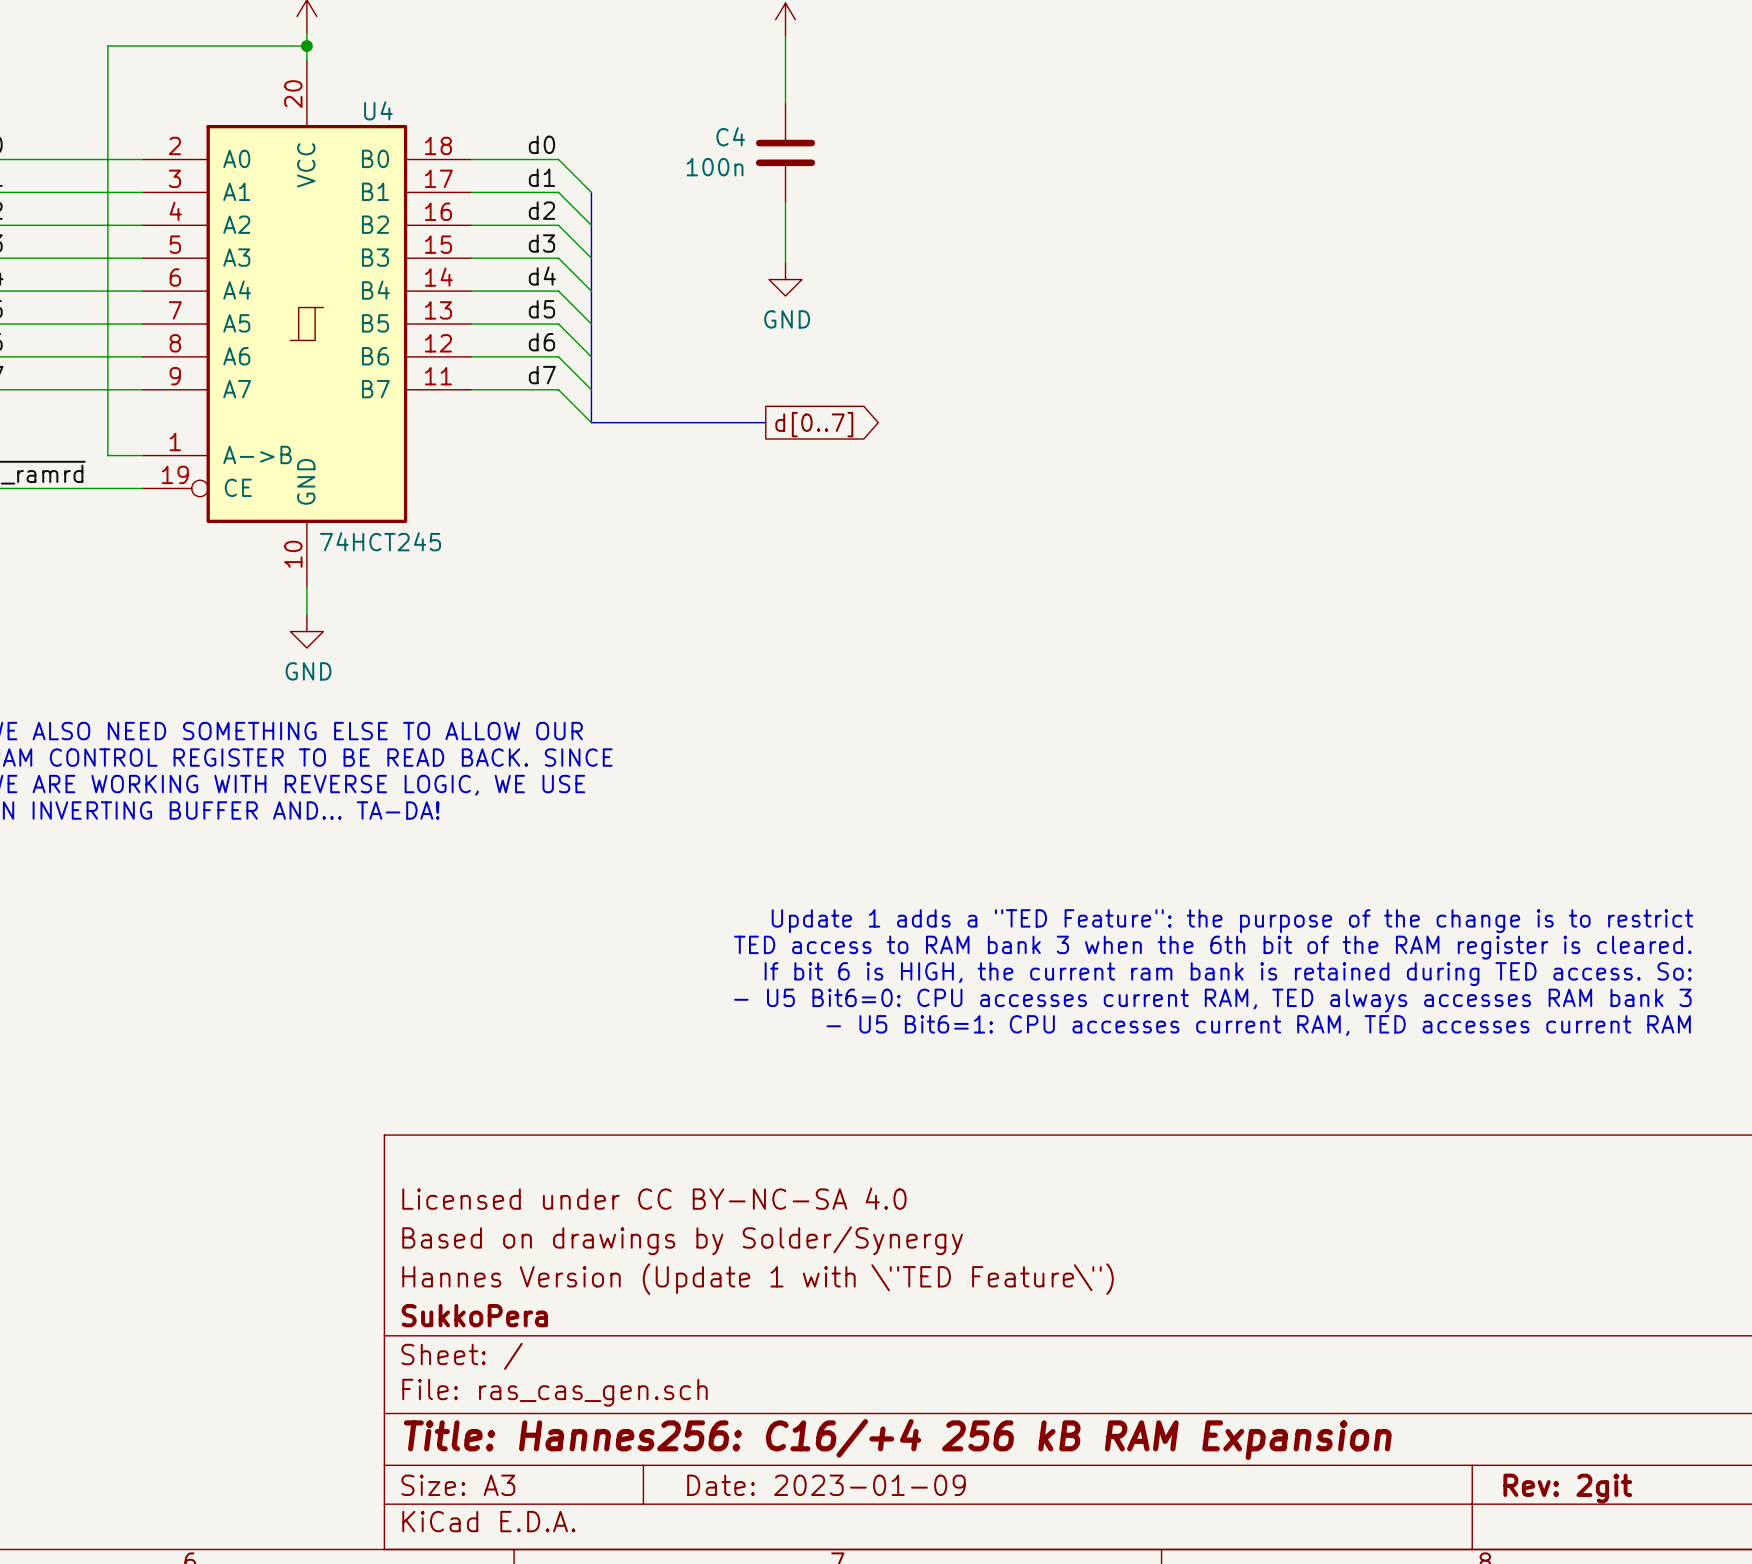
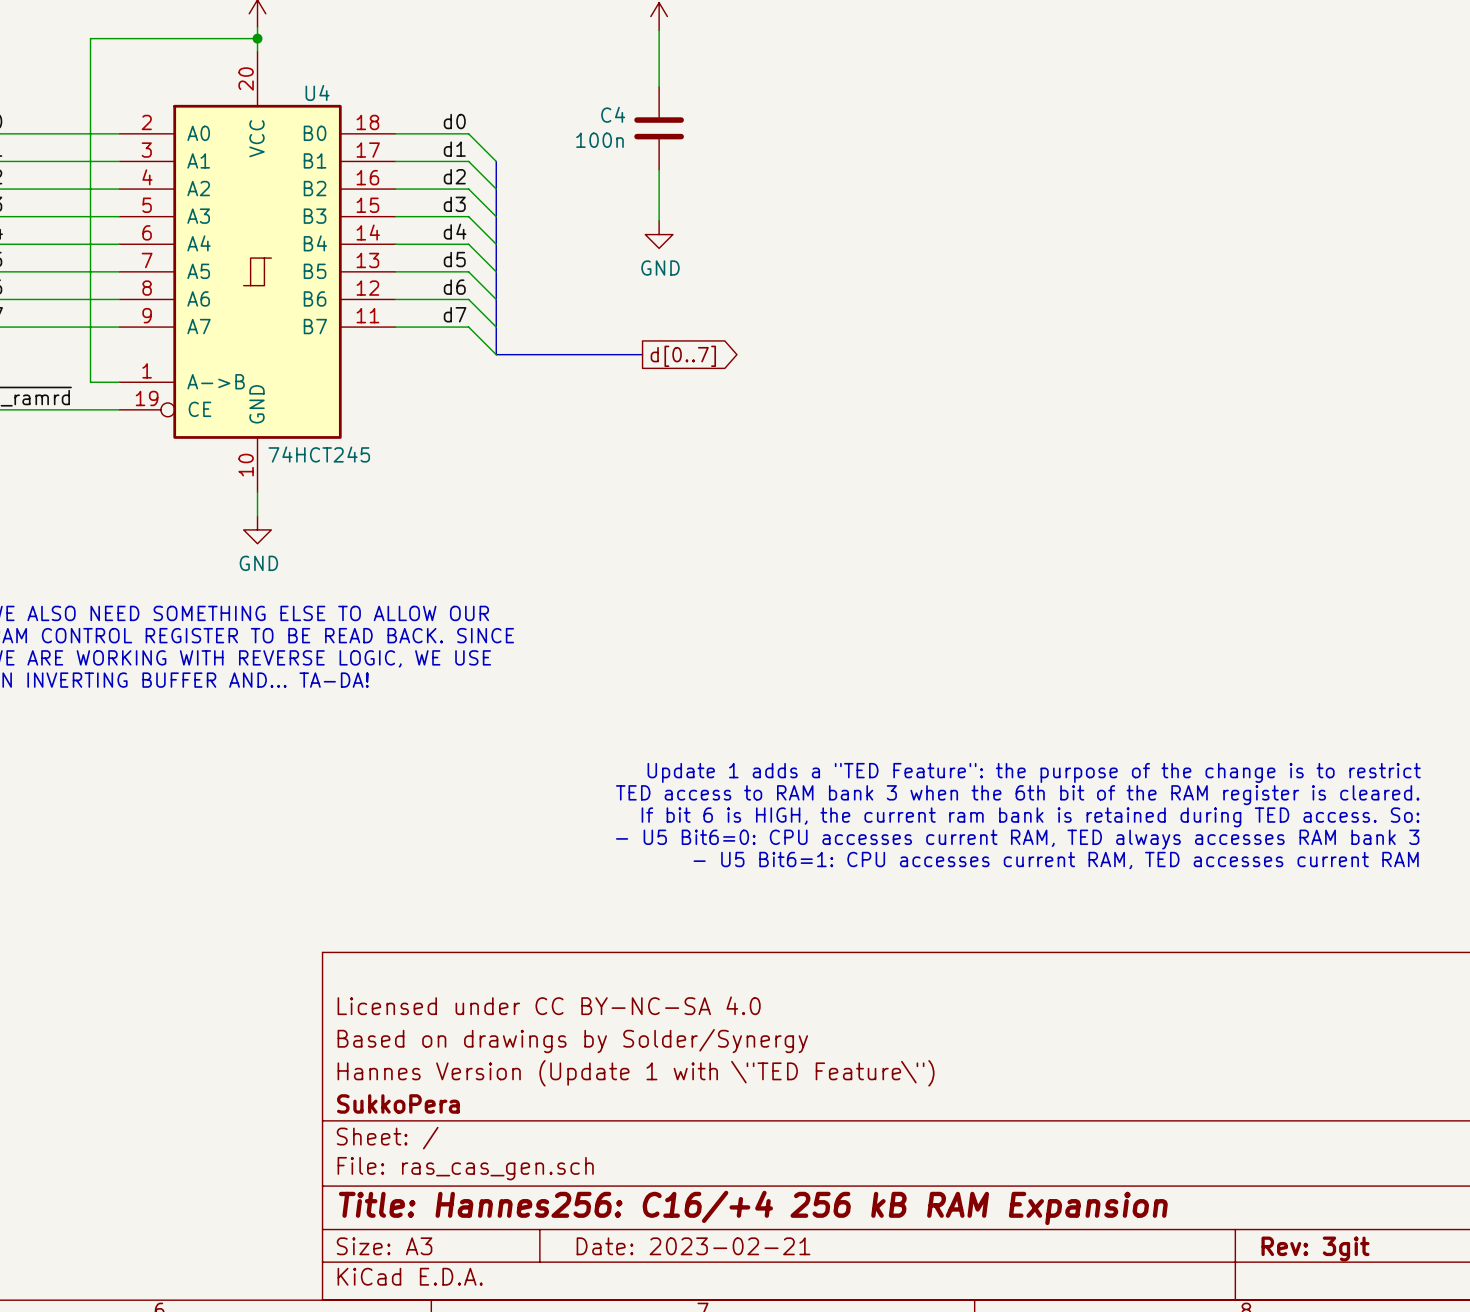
title block: Date: 2023-01-09 (826, 1485) -> Date: 2023-02-21 (693, 1246)
title block: Rev: 2git (1567, 1488) -> Rev: 3git (1315, 1249)

